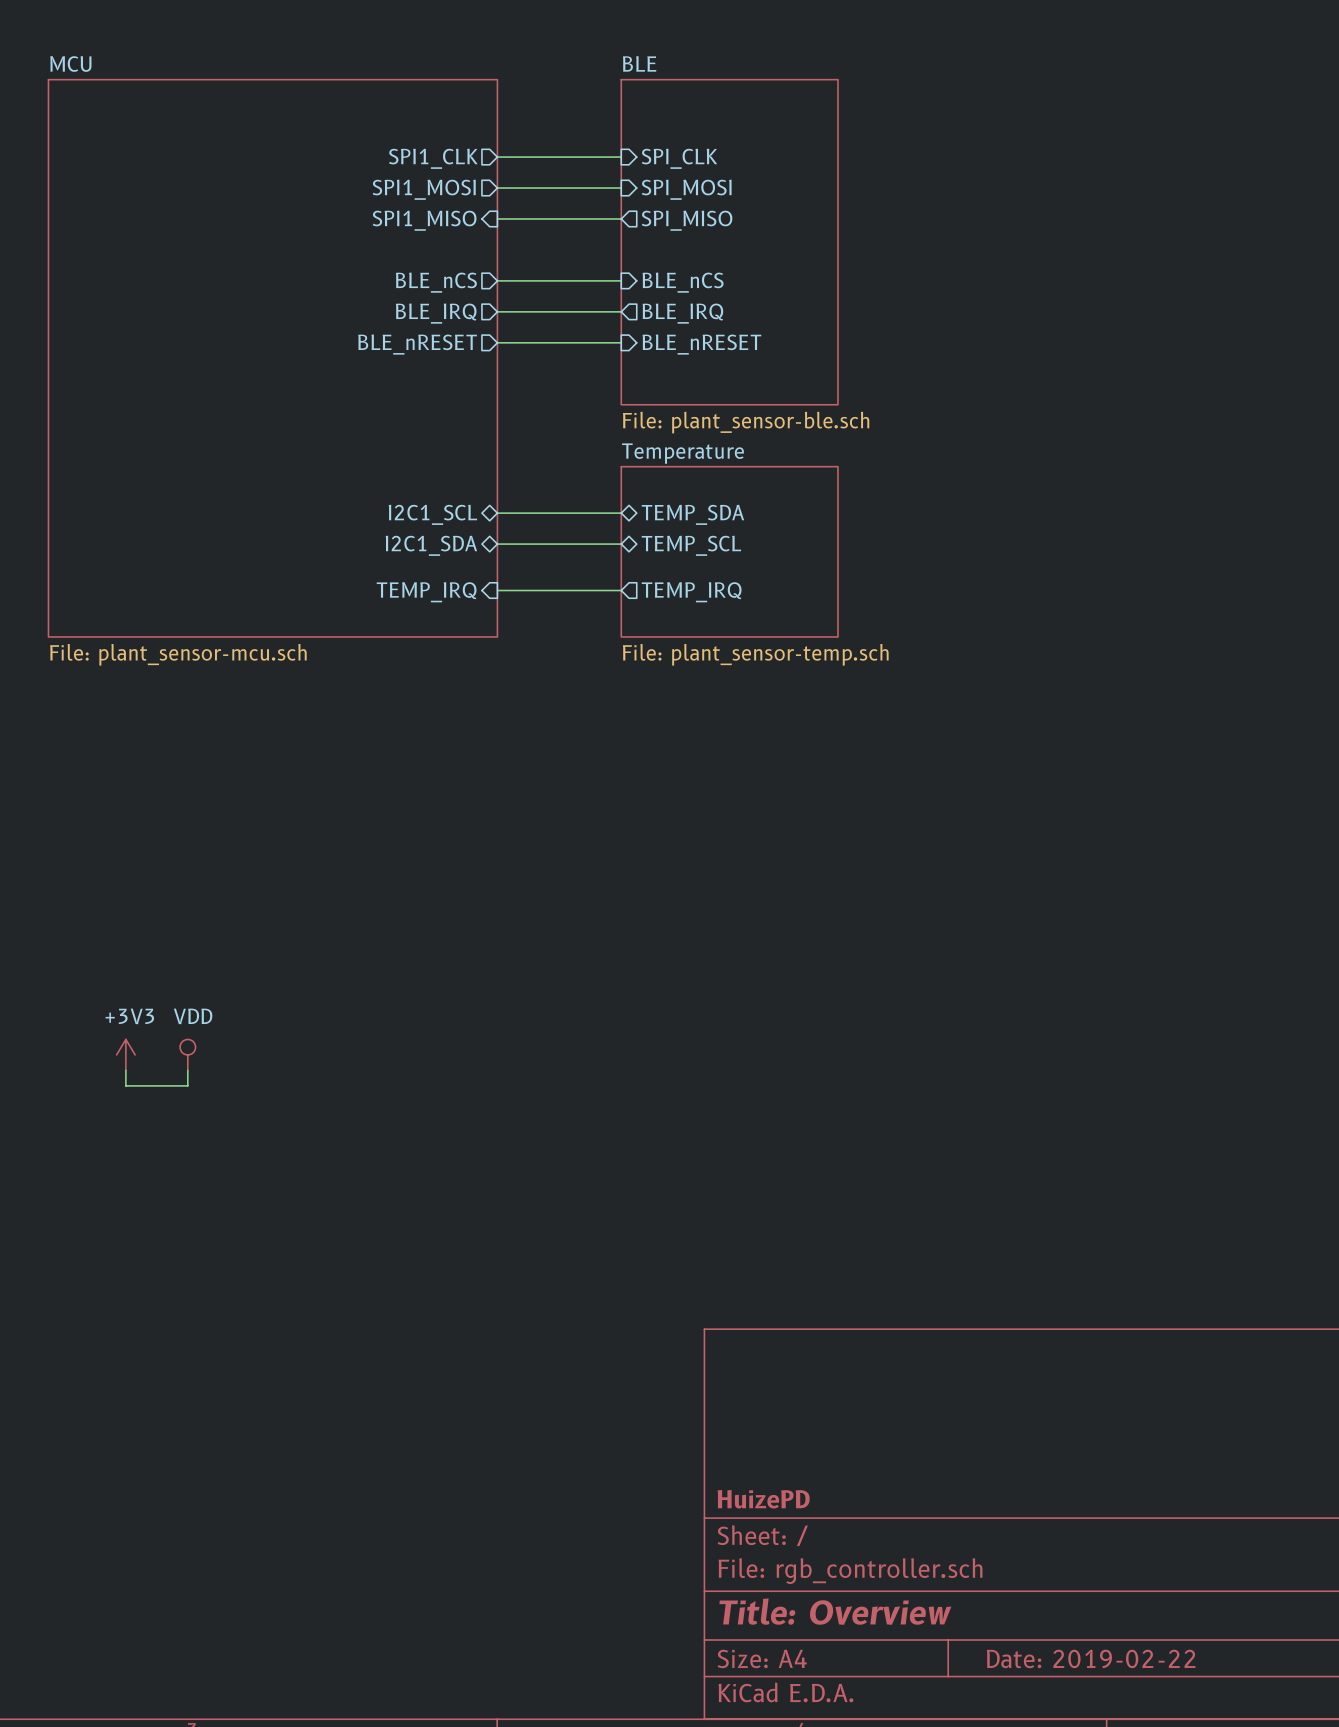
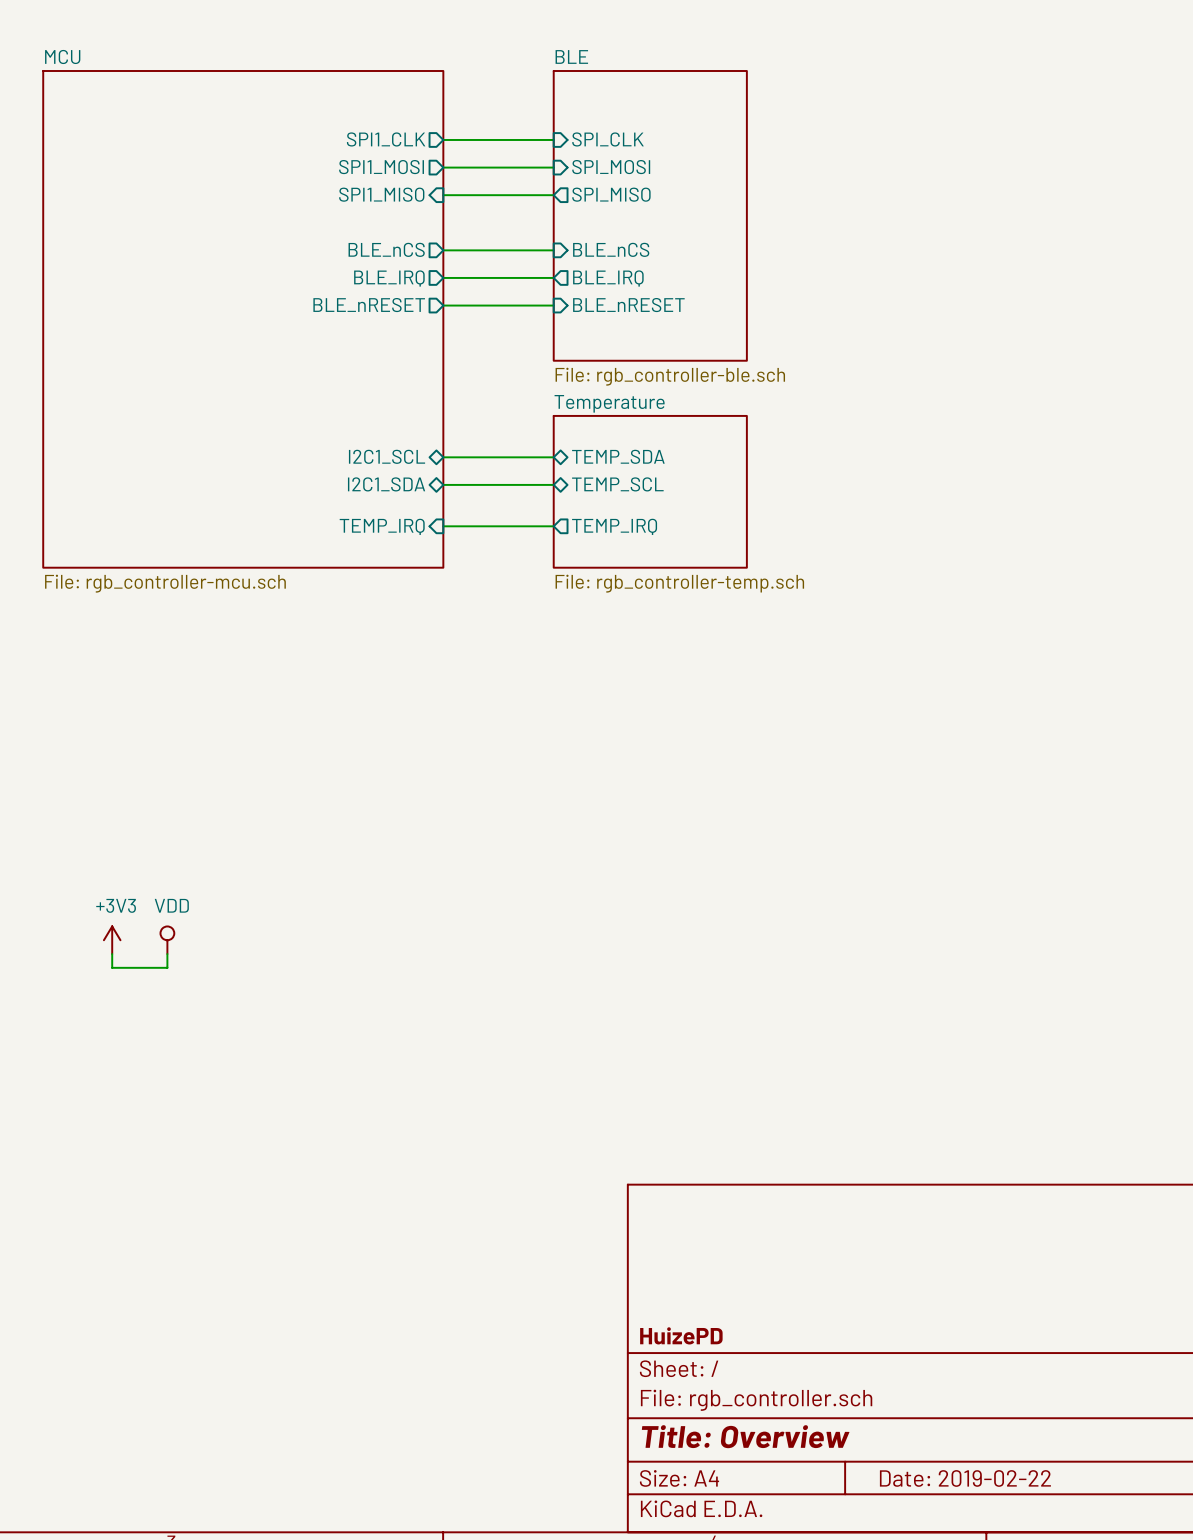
sheet BLE value: File: plant_sensor-ble.sch (746, 422) -> File: rgb_controller-ble.sch (670, 376)
sheet MCU value: File: plant_sensor-mcu.sch (178, 654) -> File: rgb_controller-mcu.sch (165, 583)
sheet Temperature value: File: plant_sensor-temp.sch (755, 654) -> File: rgb_controller-temp.sch (679, 583)

